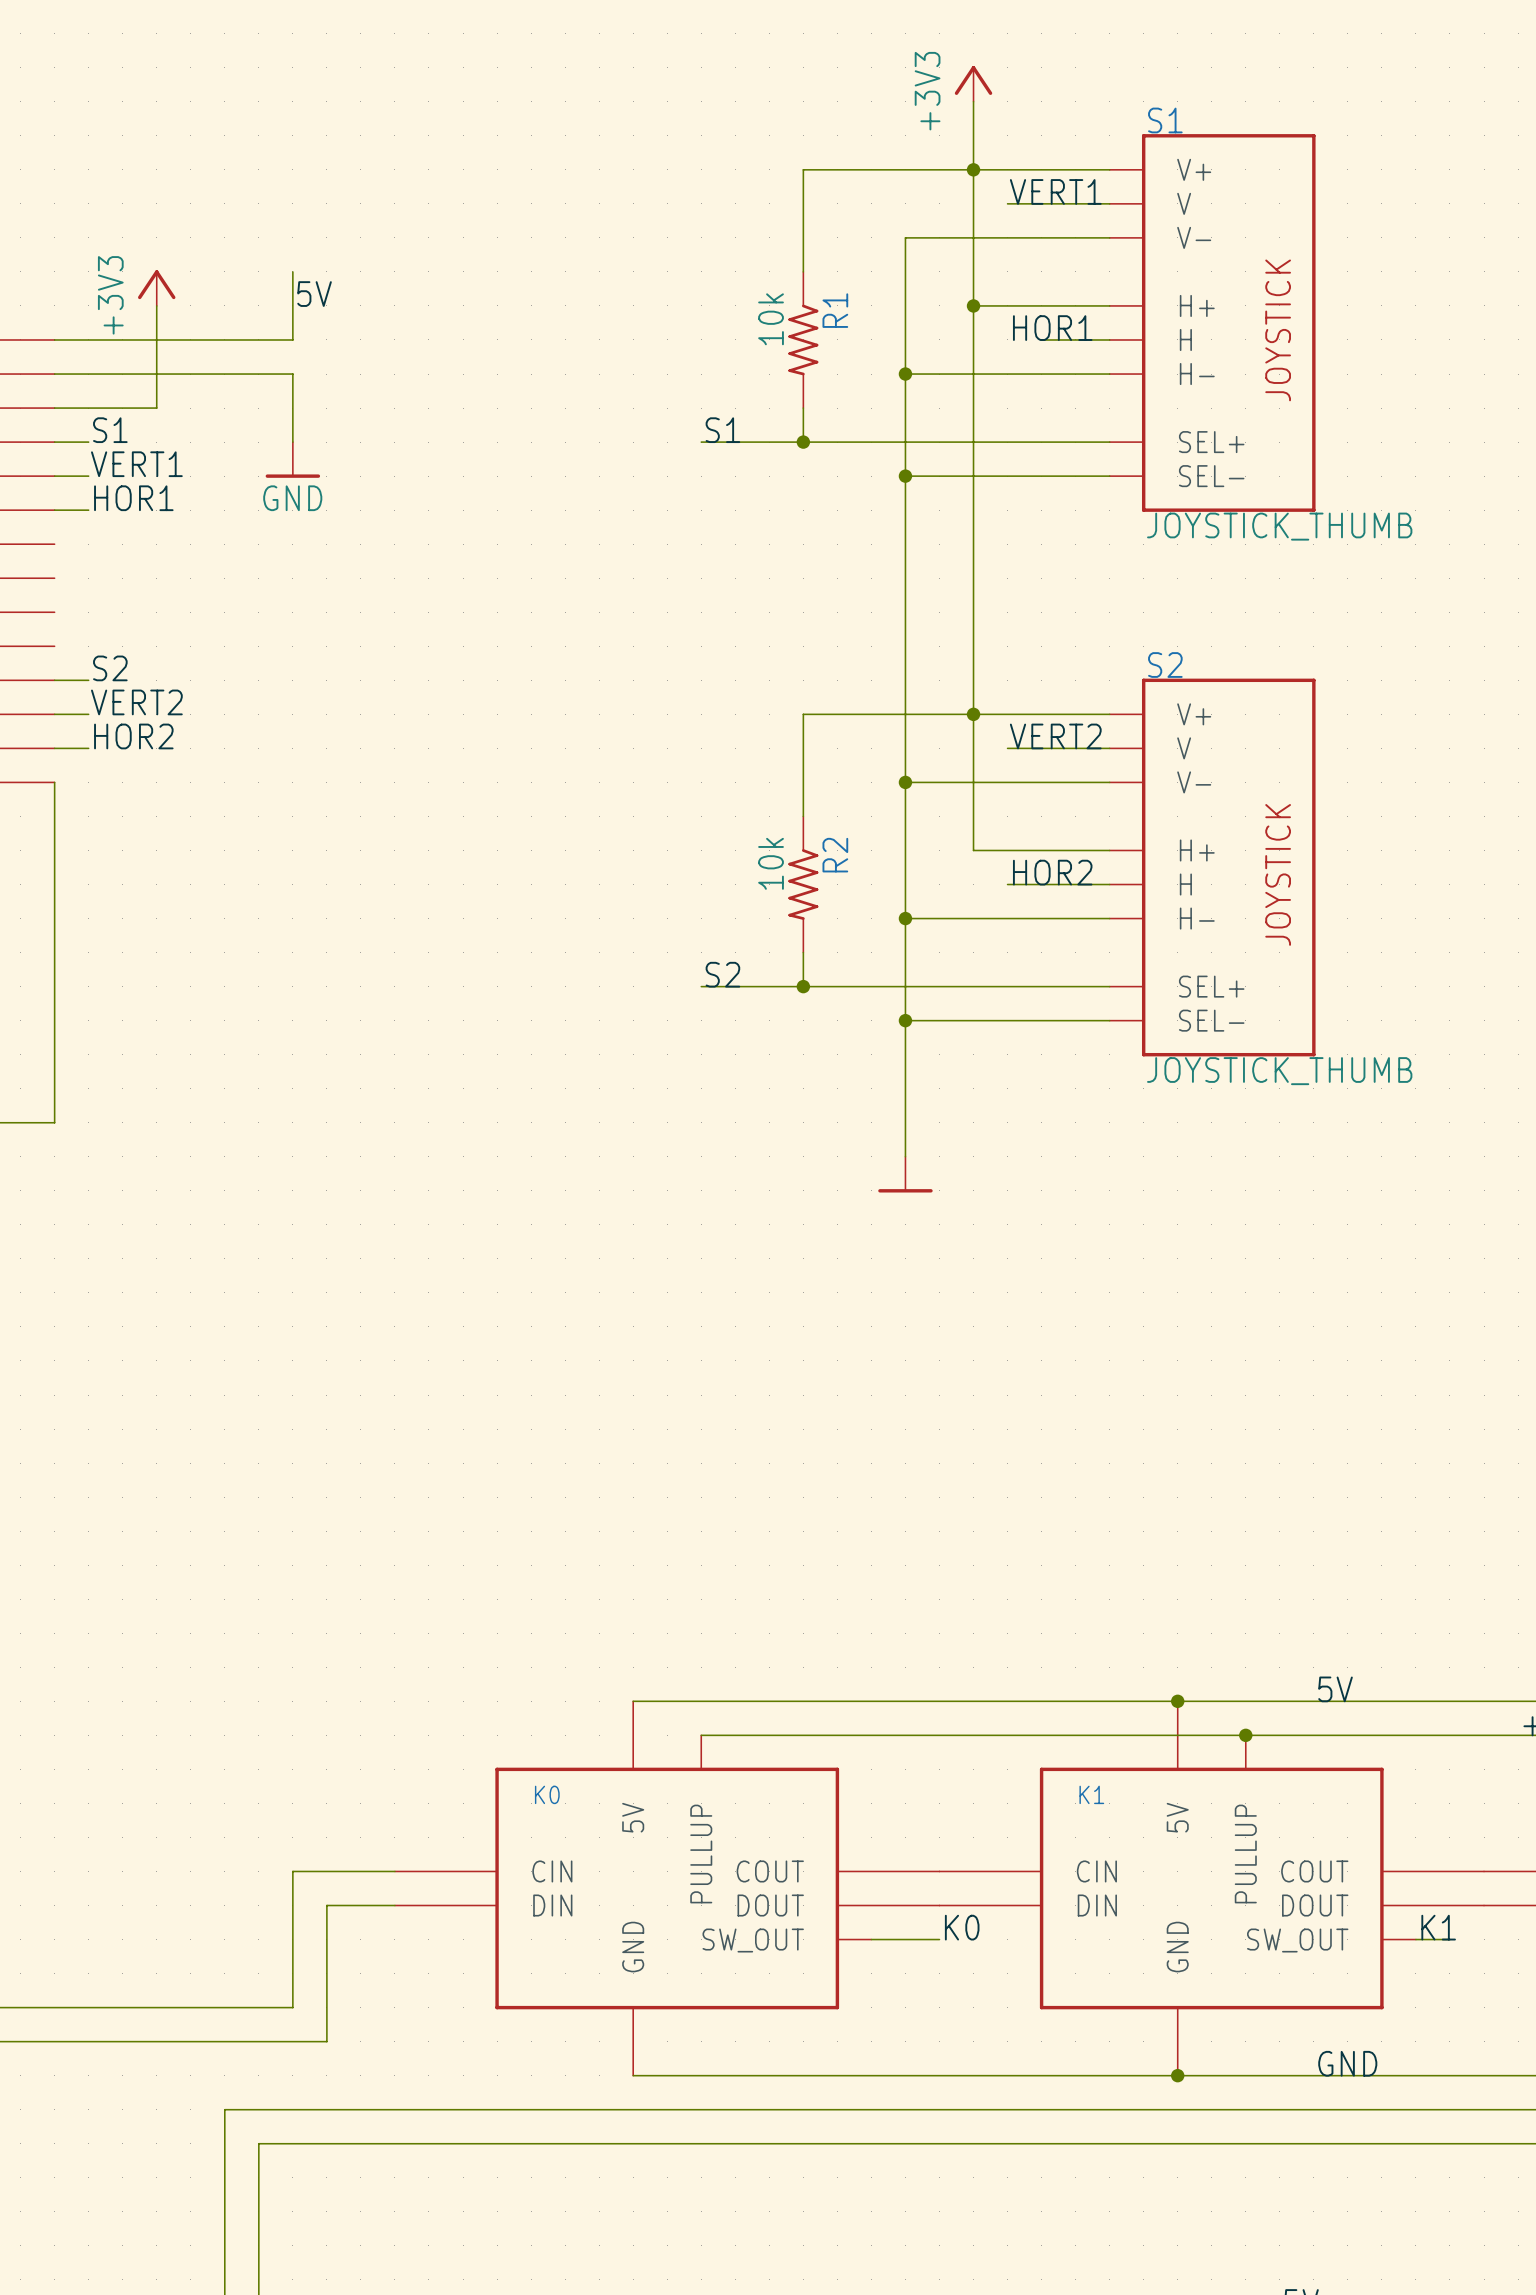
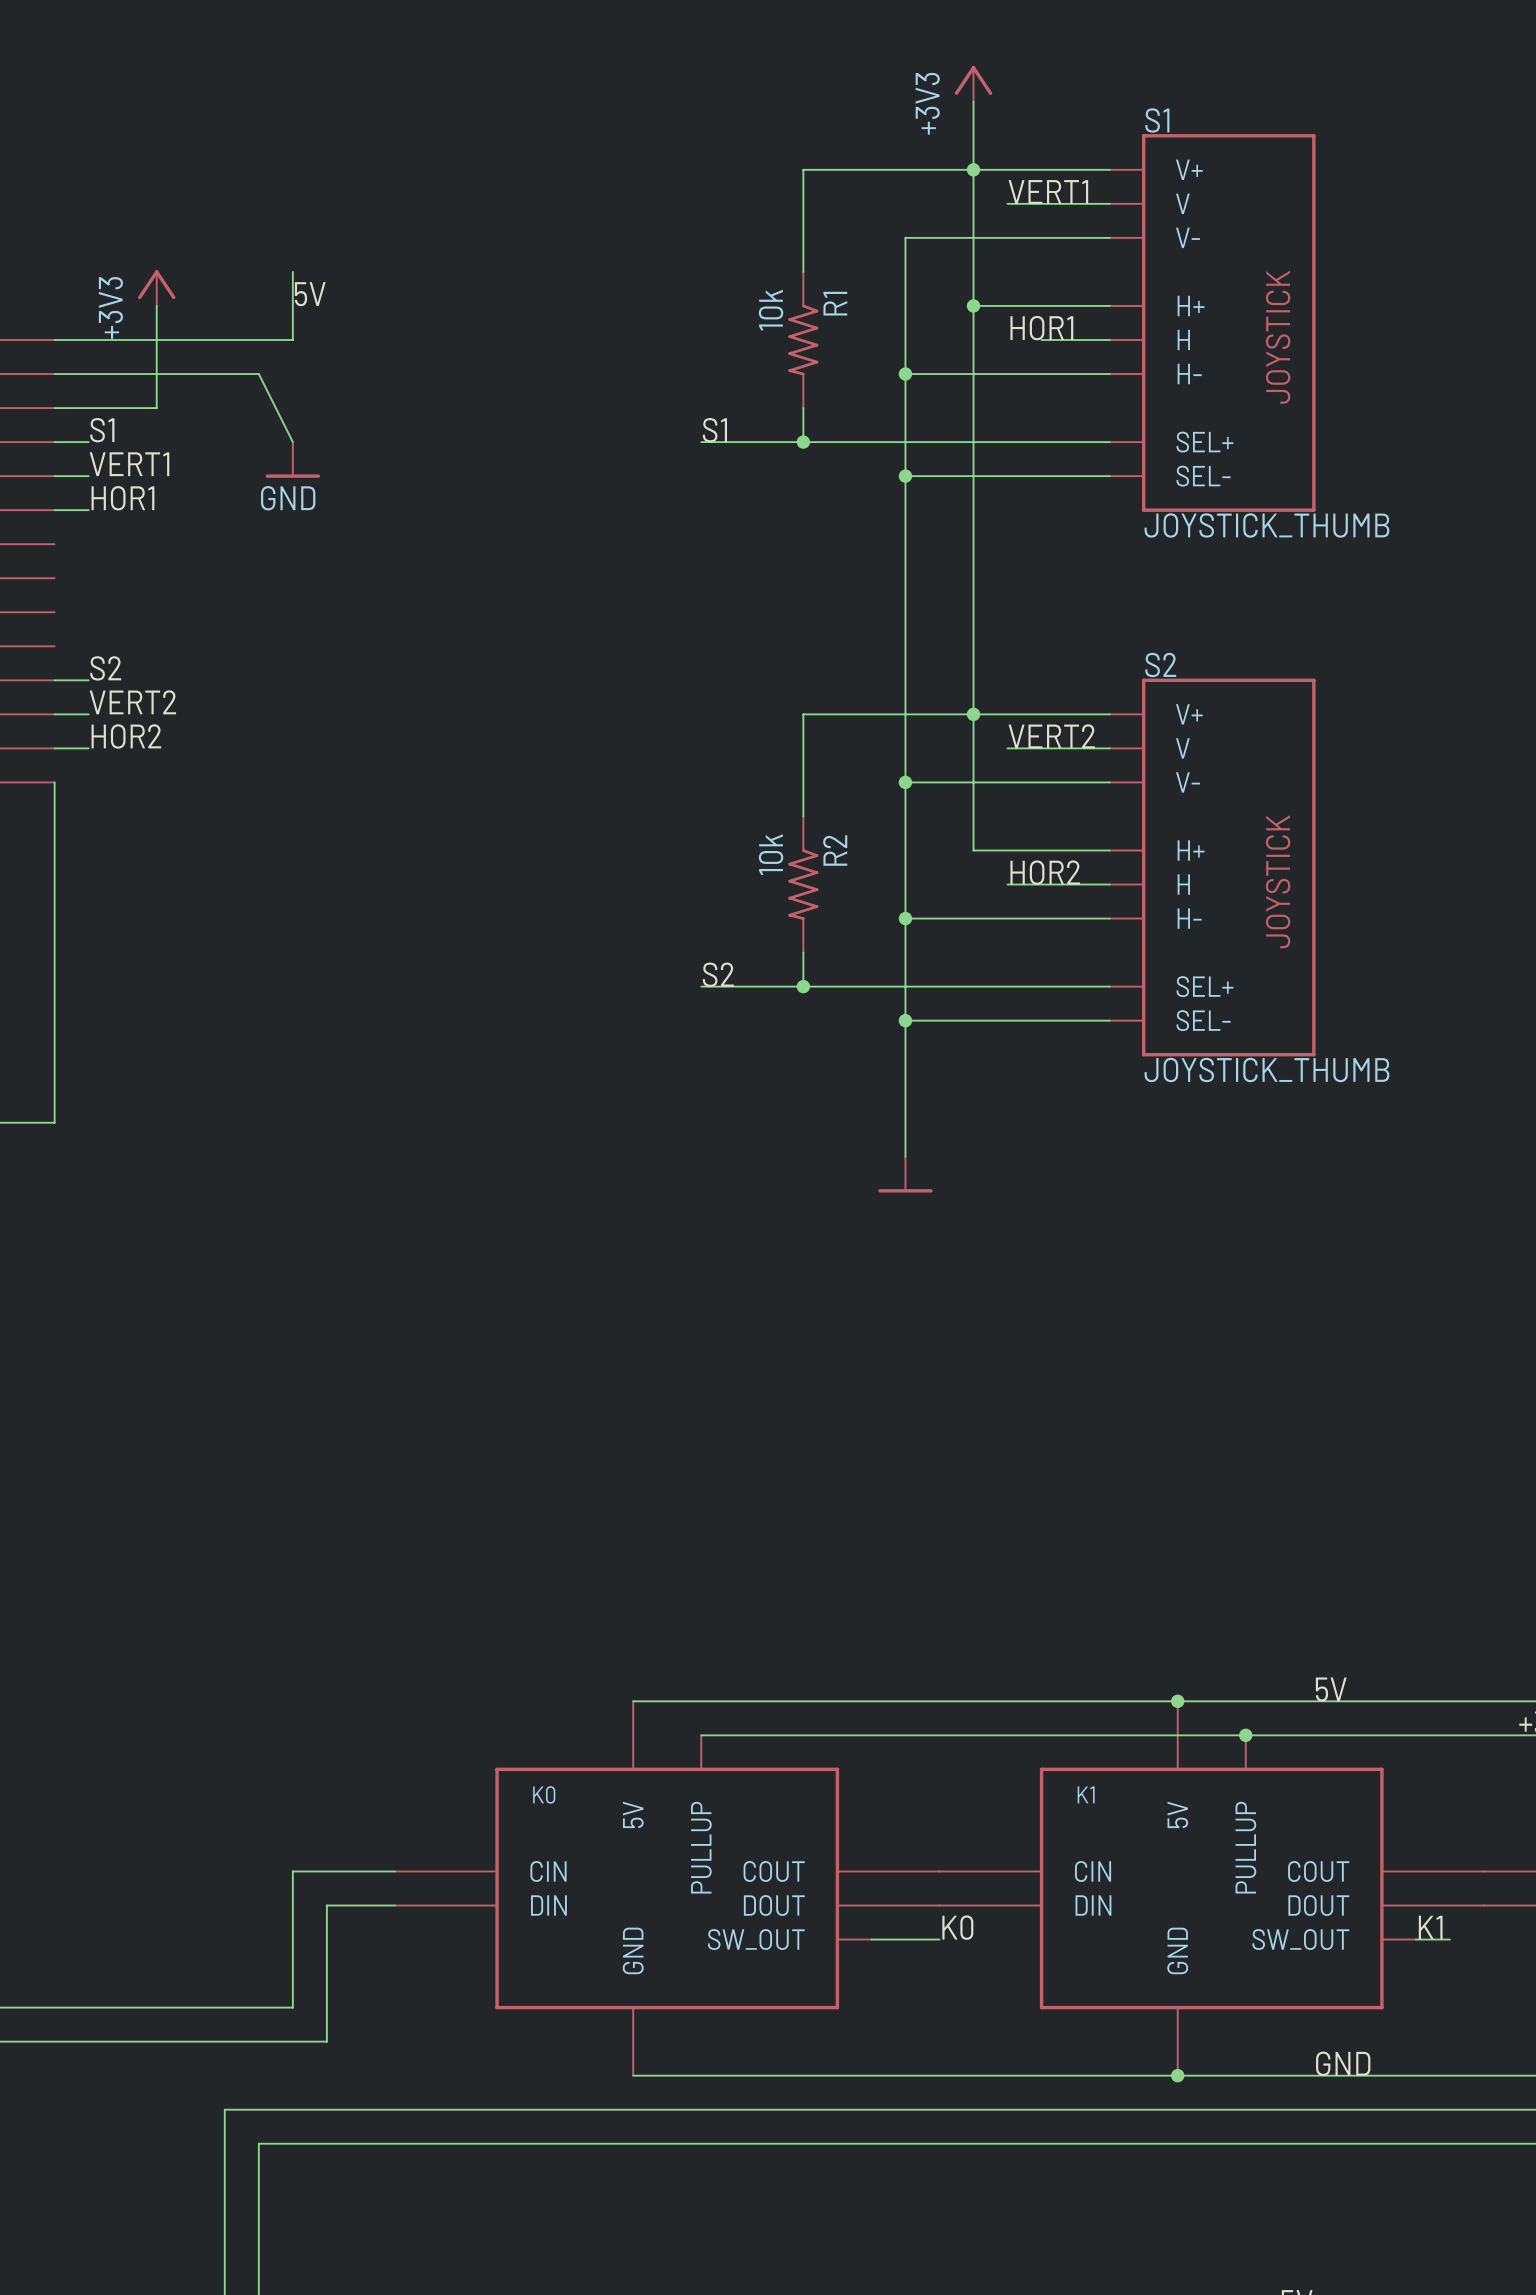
wire: (258, 374) (292, 374) (292, 442) -> (258, 374) (292, 442)

